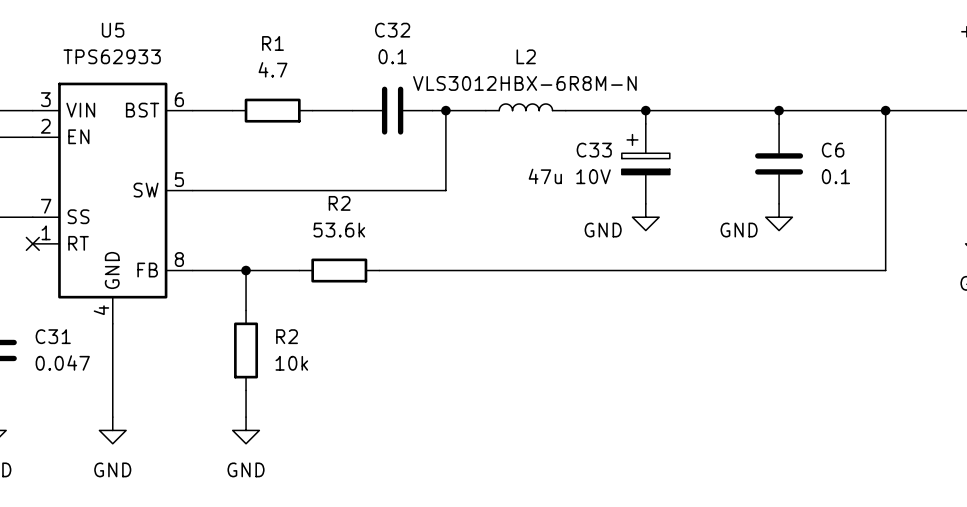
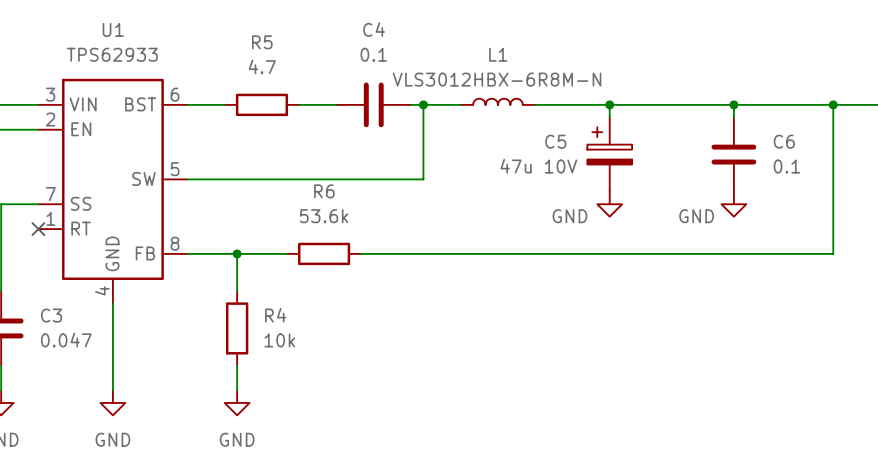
U5 name: U5 (113, 30) -> U1 (113, 29)
C32 name: C32 (392, 30) -> C4 (374, 29)
R1 name: R1 (273, 43) -> R5 (262, 42)
L2 name: L2 (526, 56) -> L1 (498, 54)
C33 name: C33 (594, 150) -> C5 (555, 141)
R2 name: R2 (339, 203) -> R6 (324, 191)
C31 name: C31 (53, 336) -> C3 (51, 315)
R2 name: R2 (287, 336) -> R4 (275, 315)

